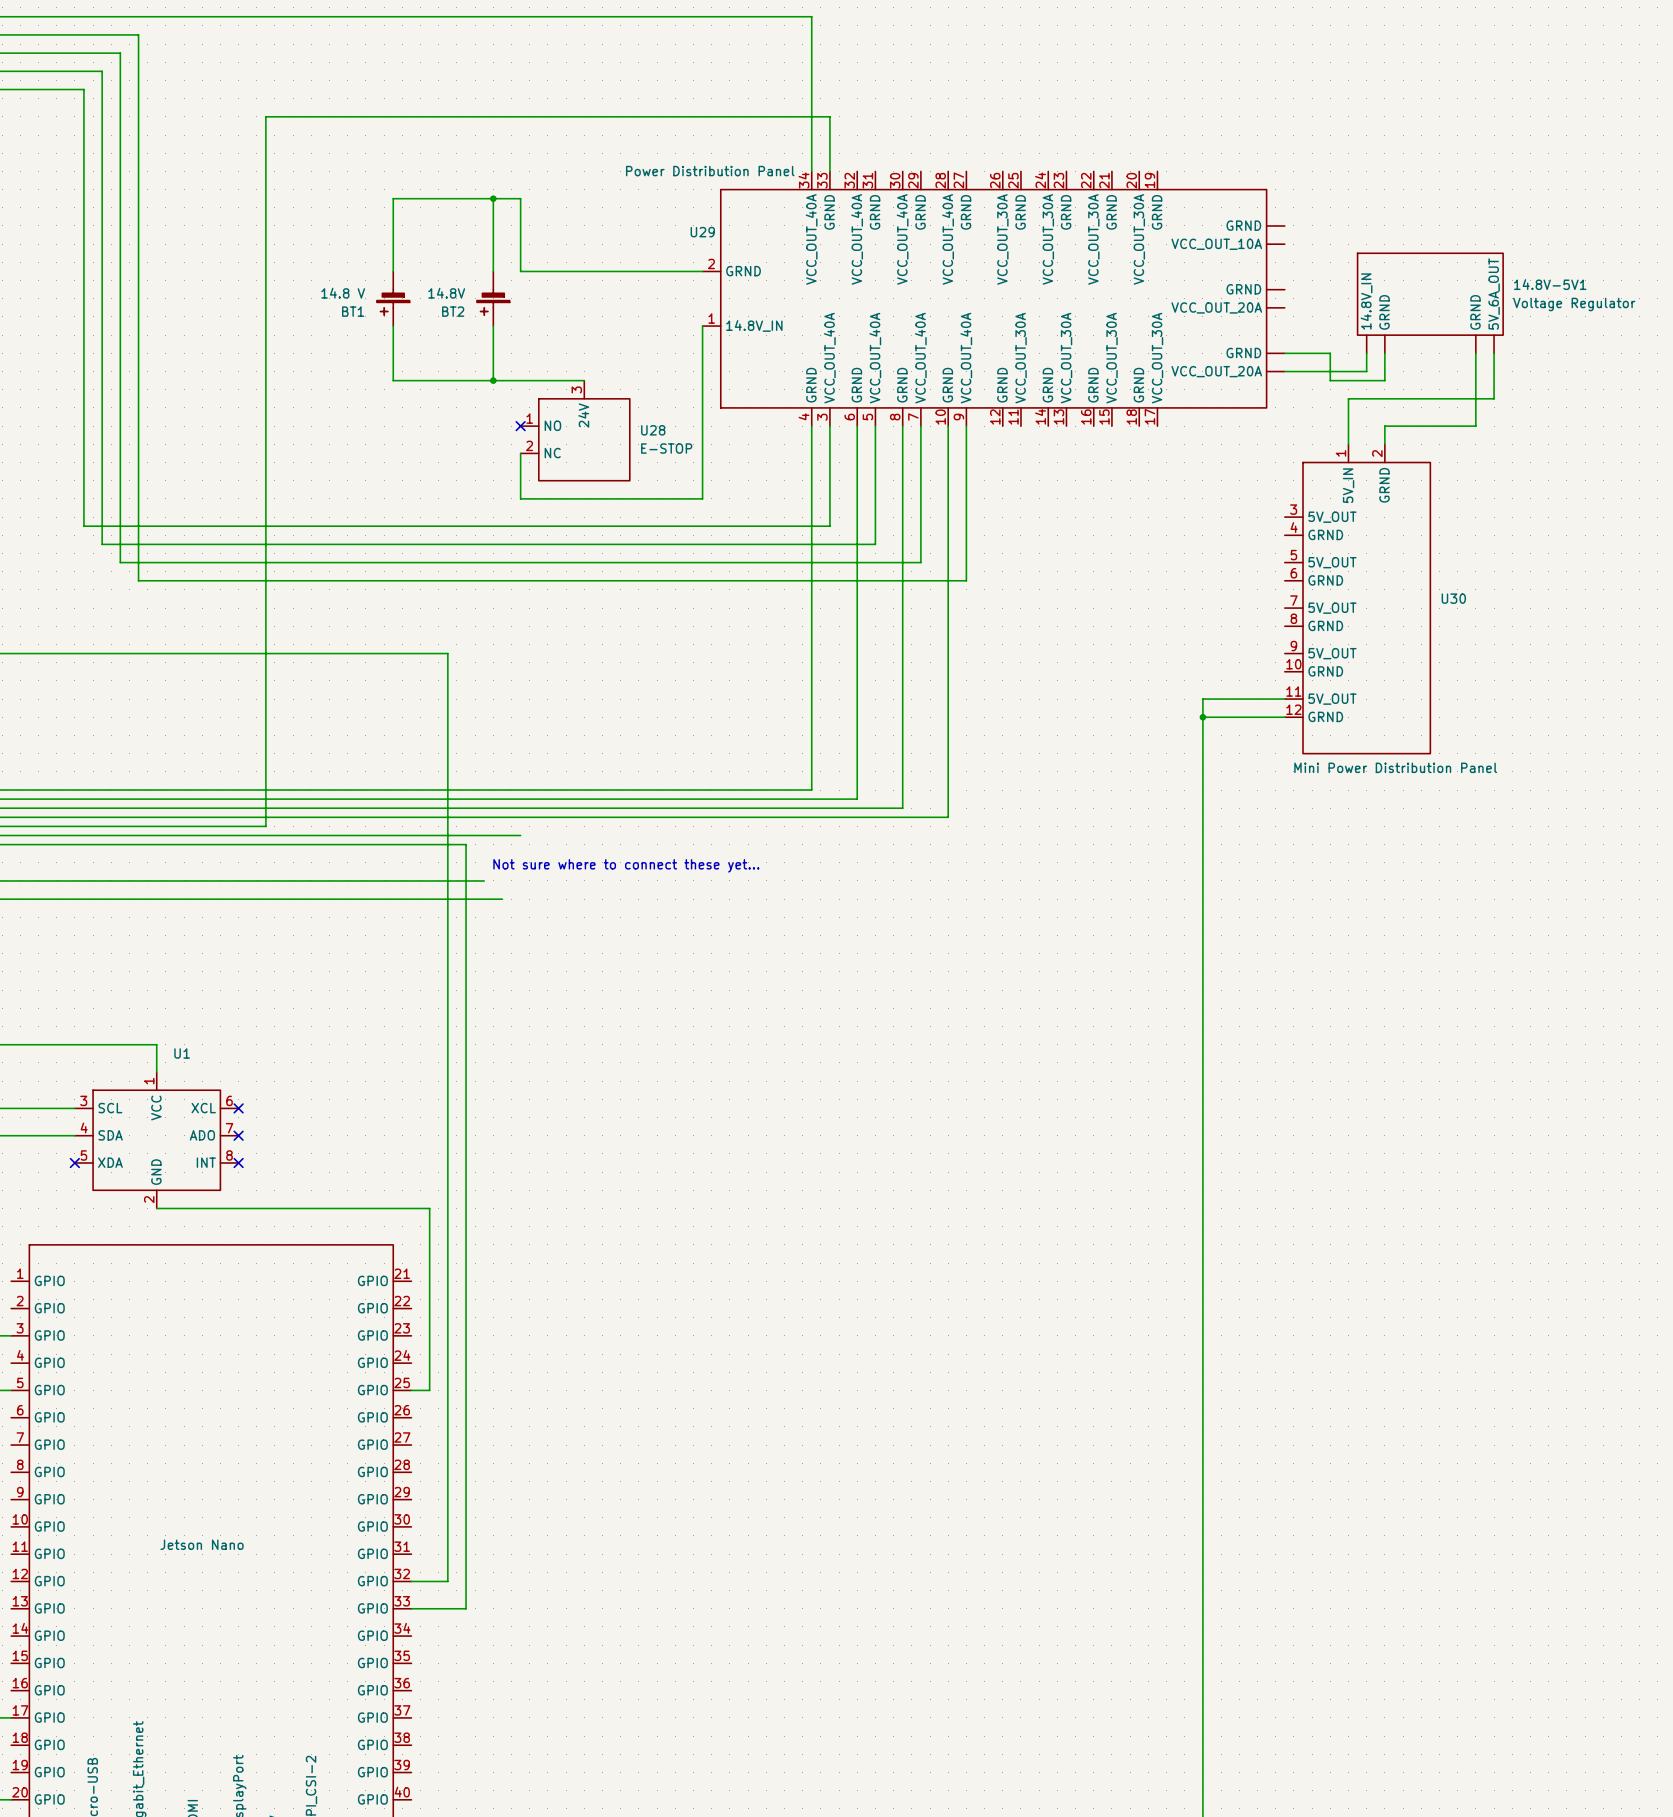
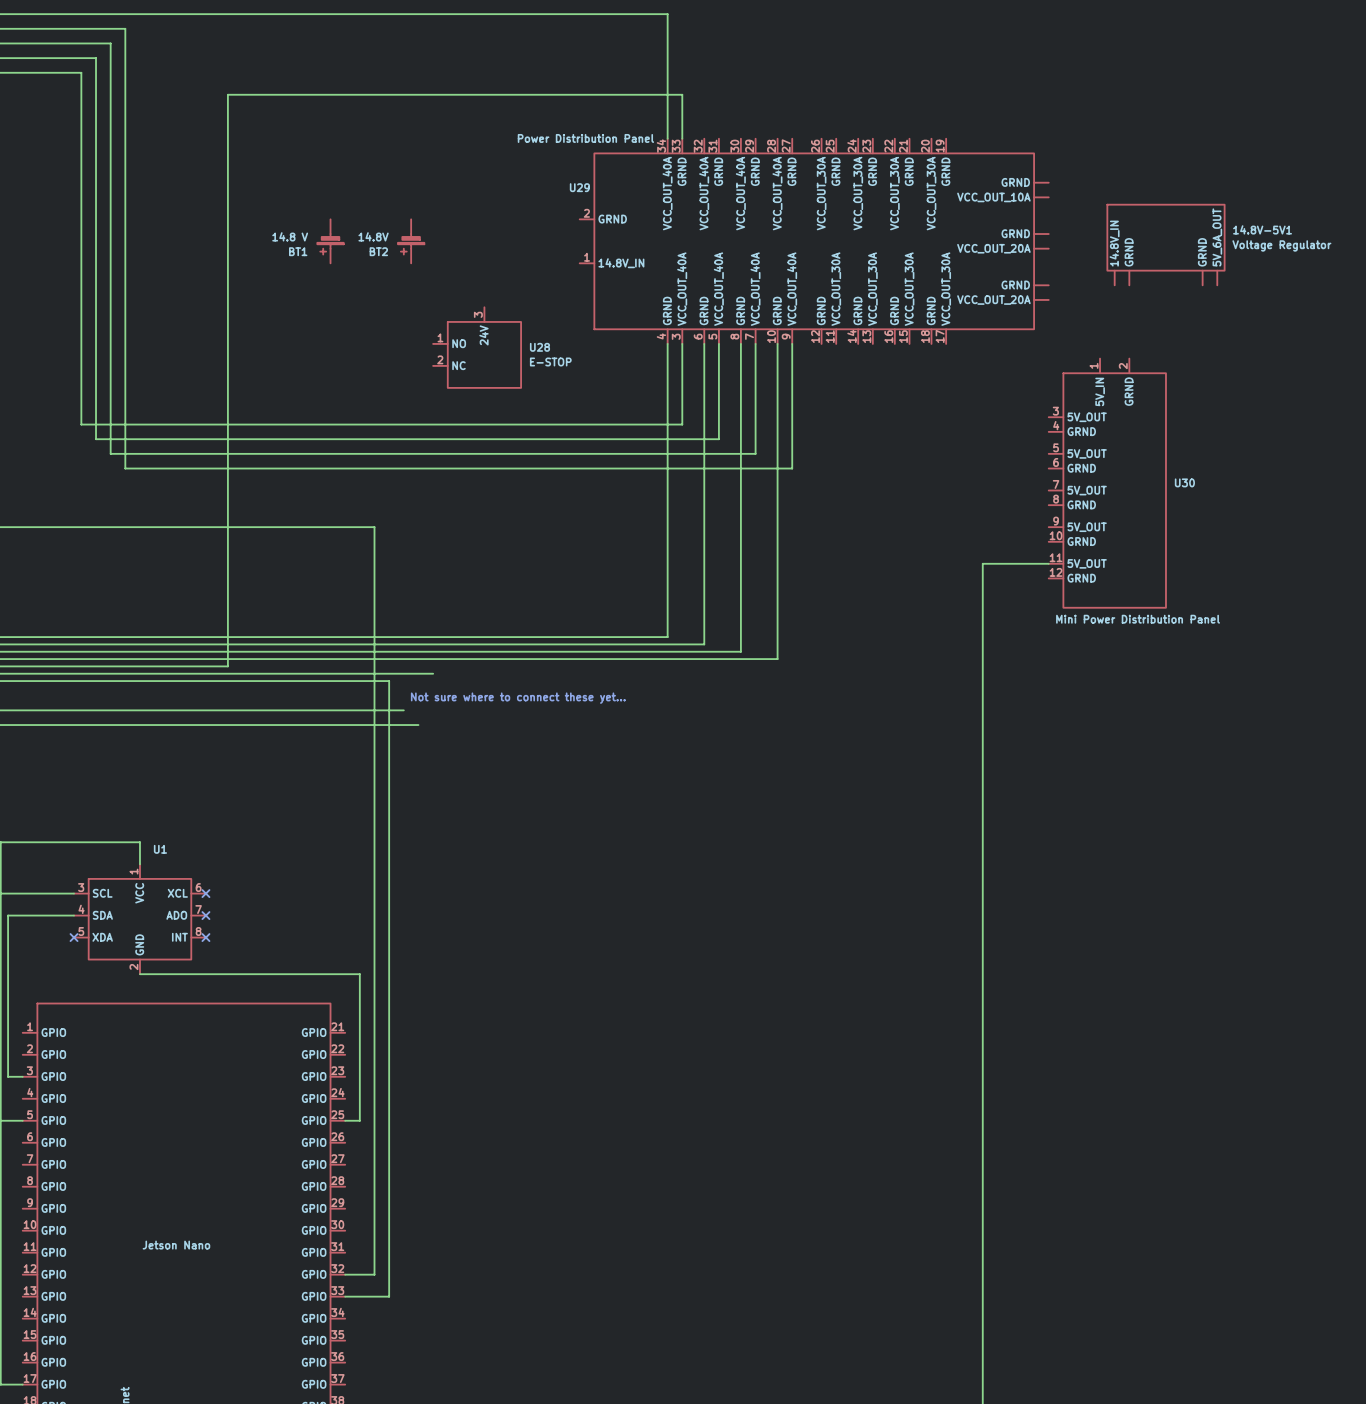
wire: (493, 198) (493, 271) -> none
junction: (493, 198) -> none
wire: (393, 271) (393, 198) (520, 198) (520, 271) (702, 271) -> none
wire: (393, 326) (393, 380) (584, 380) -> none
wire: (493, 326) (493, 380) -> none
wire: (702, 326) (702, 498) (520, 498) (520, 453) -> none
wire: (1284, 353) (1330, 353) (1330, 380) (1384, 380) (1384, 353) -> none
wire: (1366, 353) (1366, 371) (1284, 371) -> none
wire: (1475, 353) (1475, 426) (1384, 426) (1384, 444) -> none
wire: (1494, 353) (1494, 398) (1348, 398) (1348, 444) -> none
junction: (493, 380) -> none
no-connect mark: (520, 426) -> none
wire: (1202, 717) (1284, 717) -> none
junction: (1202, 717) -> none

